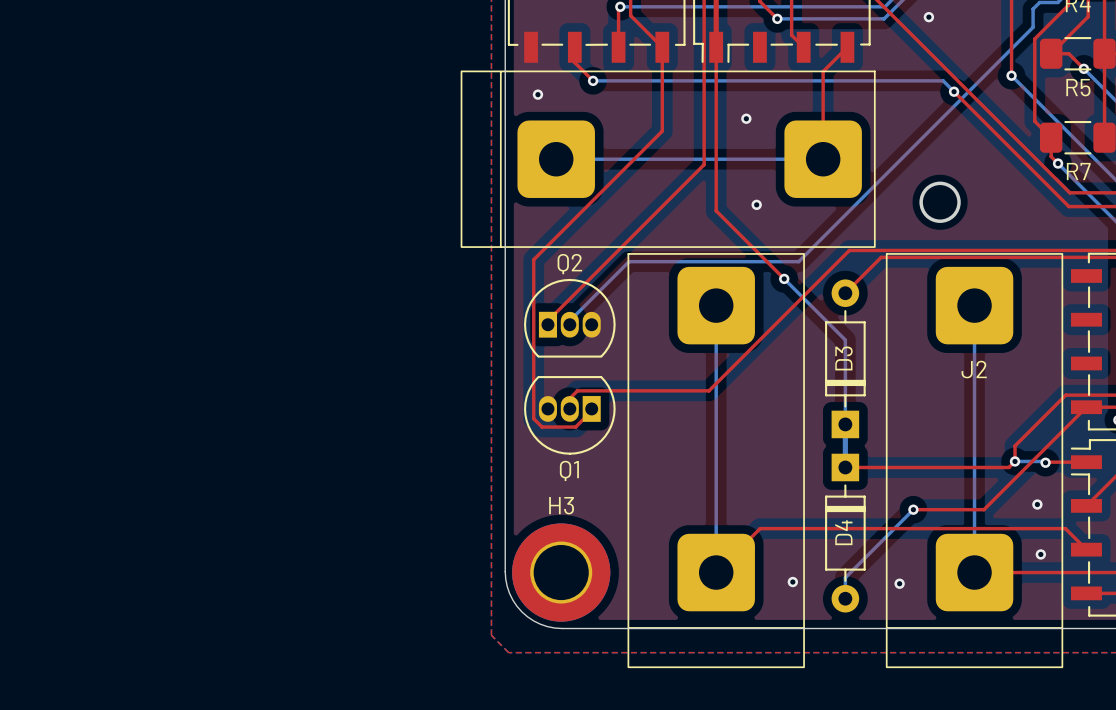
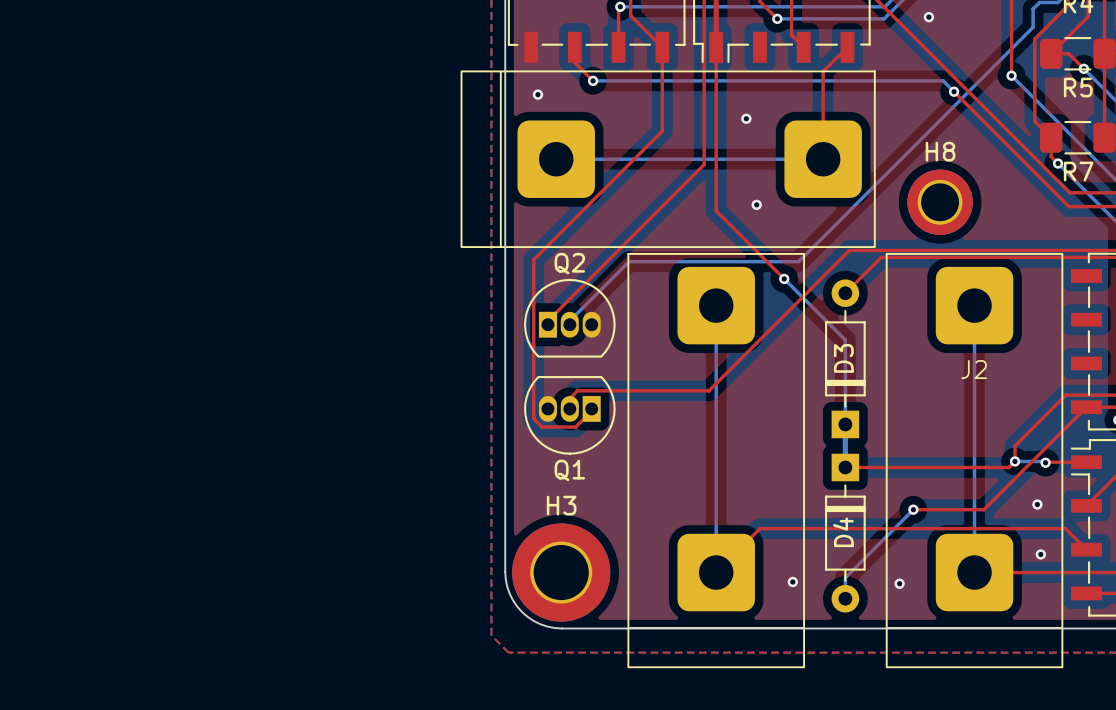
round board edge: [919, 181, 961, 223] -> none
H8: none -> (940, 202)

